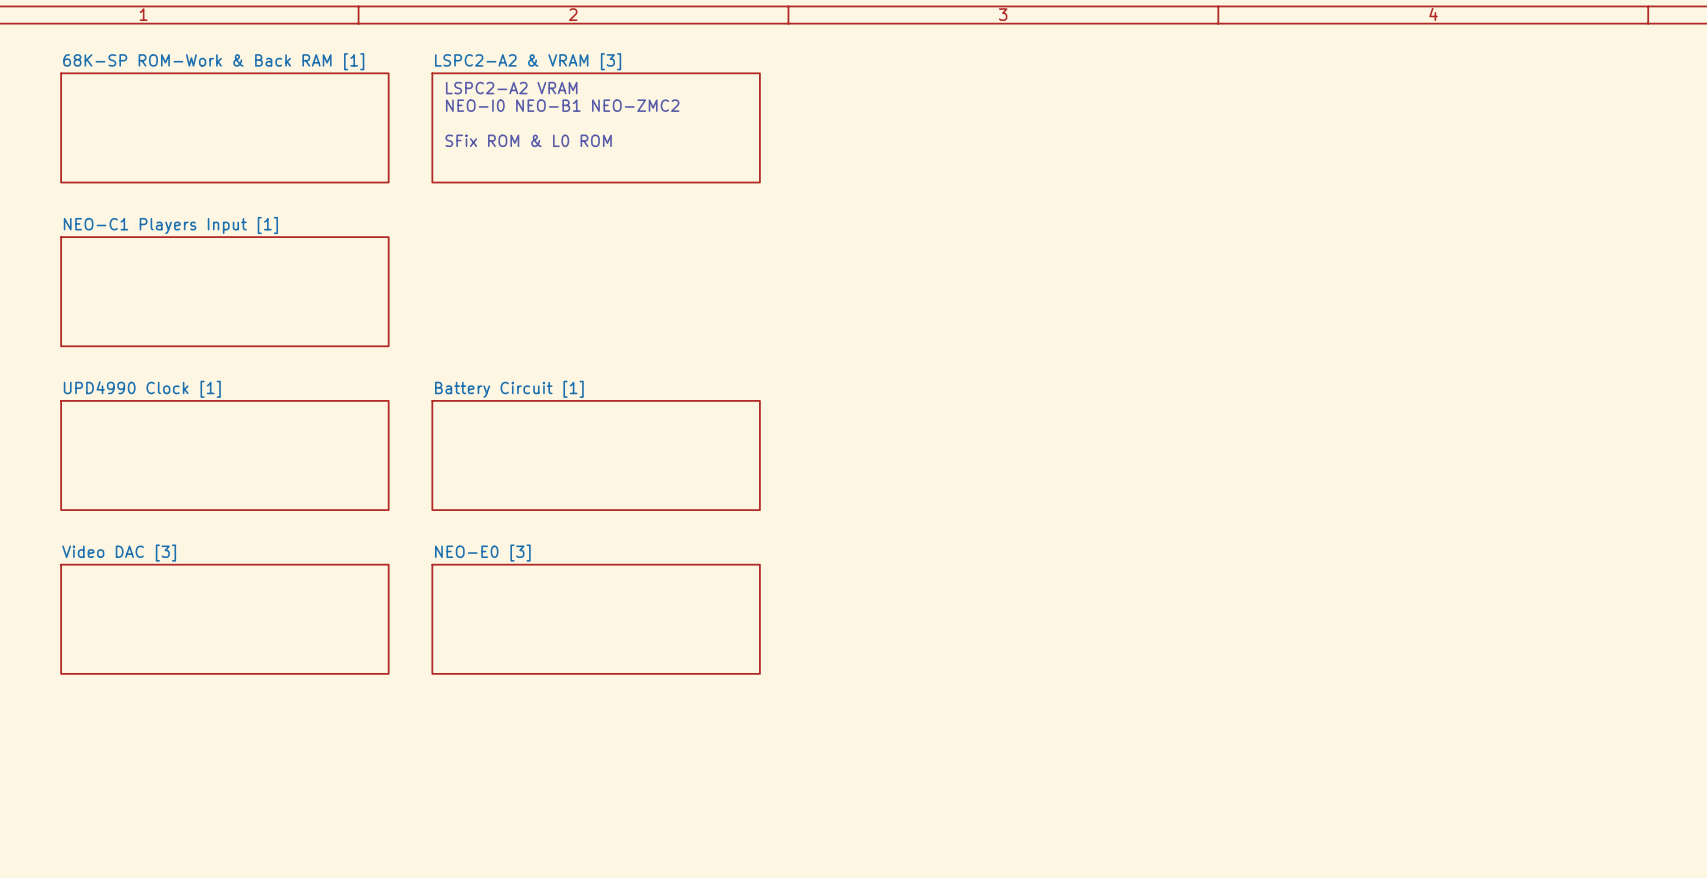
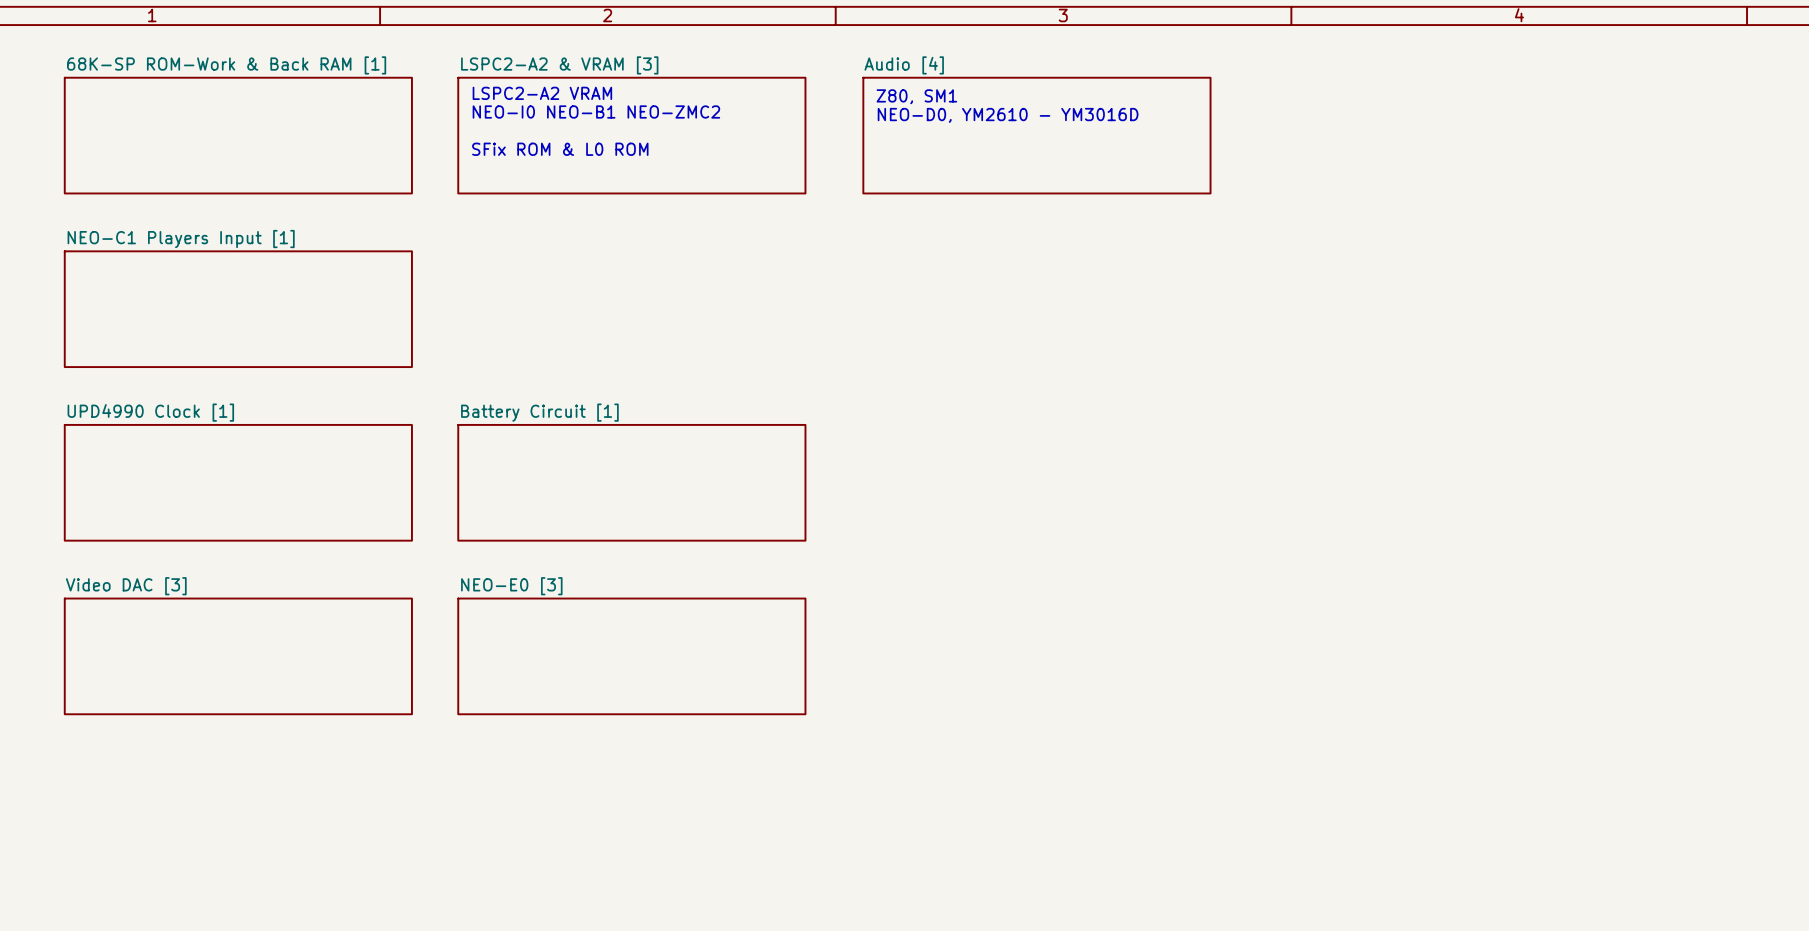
text: none -> Z80, SM1 (916, 96)
text: none -> NEO-D0, YM2610 - YM3016D (1008, 115)
sheet Audio [4]: none -> (1036, 135)

